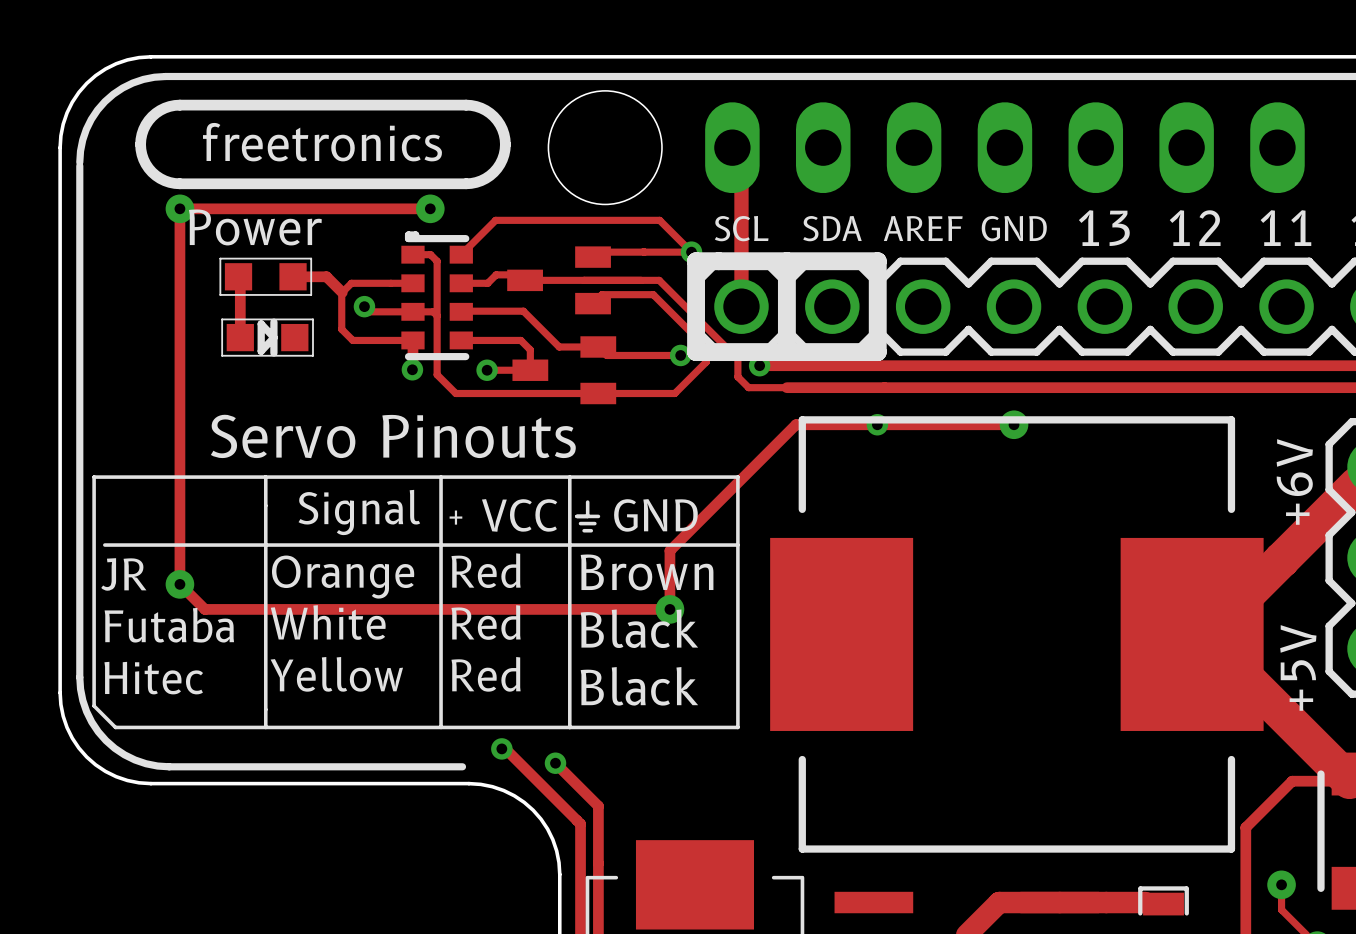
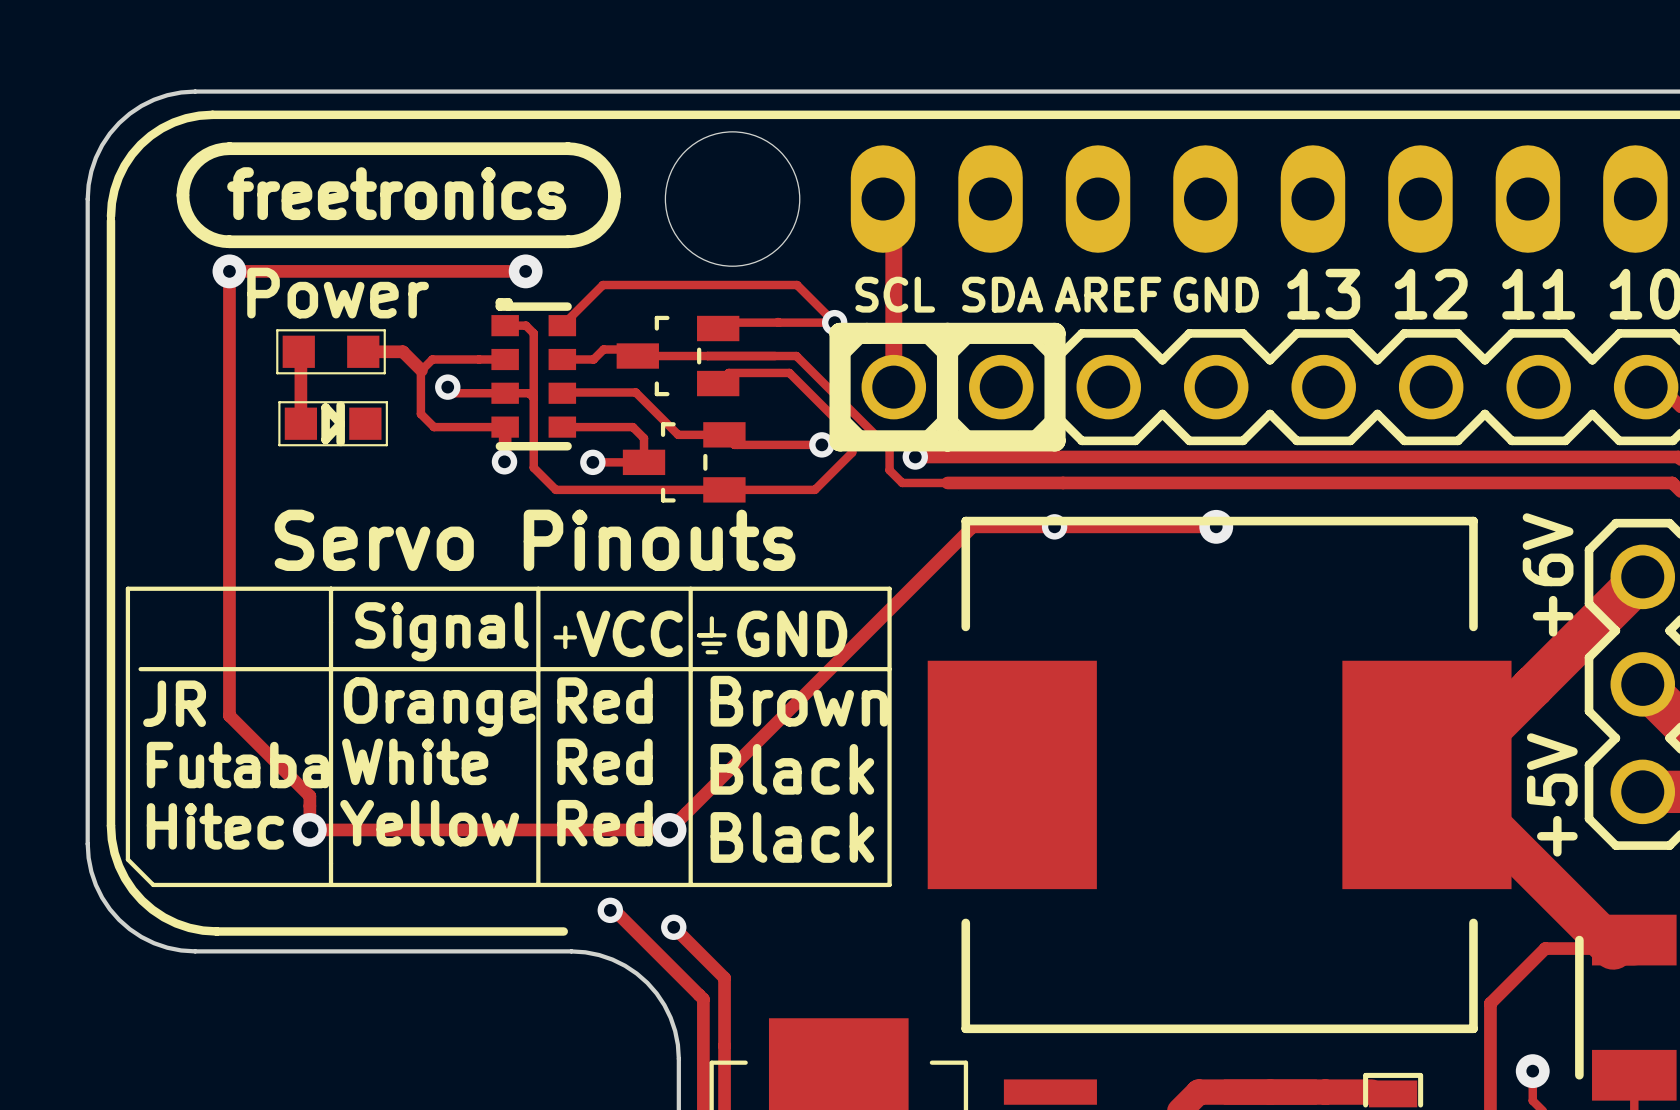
part footprint: [507, 246, 611, 315] -> [616, 315, 740, 397]
part footprint: [512, 336, 617, 405] -> [622, 422, 746, 503]
track: (808, 424) (795, 424) (669, 550) (669, 609) (204, 609) -> (972, 526) (669, 829) (309, 829) (309, 796) (259, 745)
via: (179, 584) -> none
via: (669, 609) -> none
via: none -> (309, 829)
via: none -> (669, 829)

